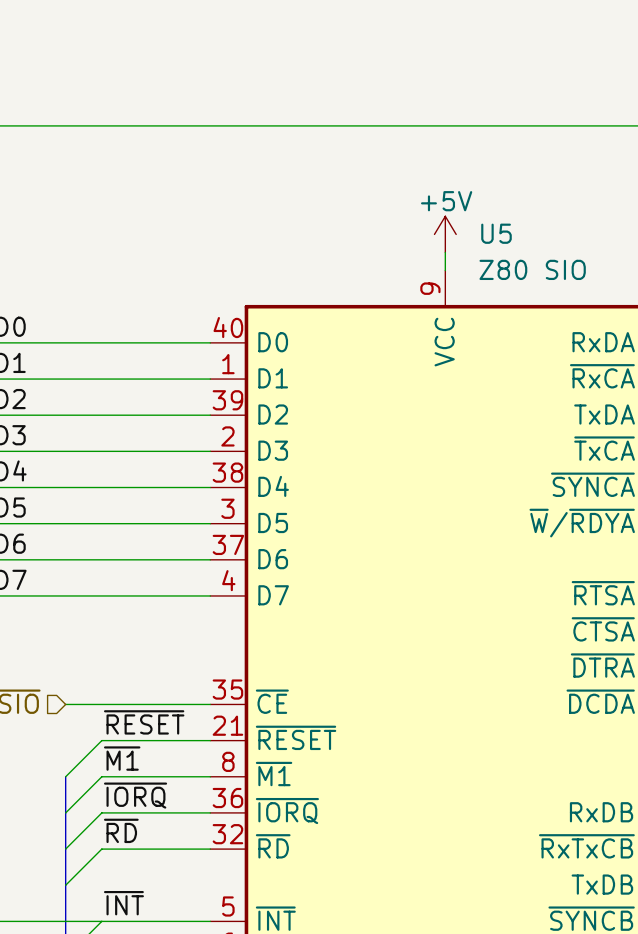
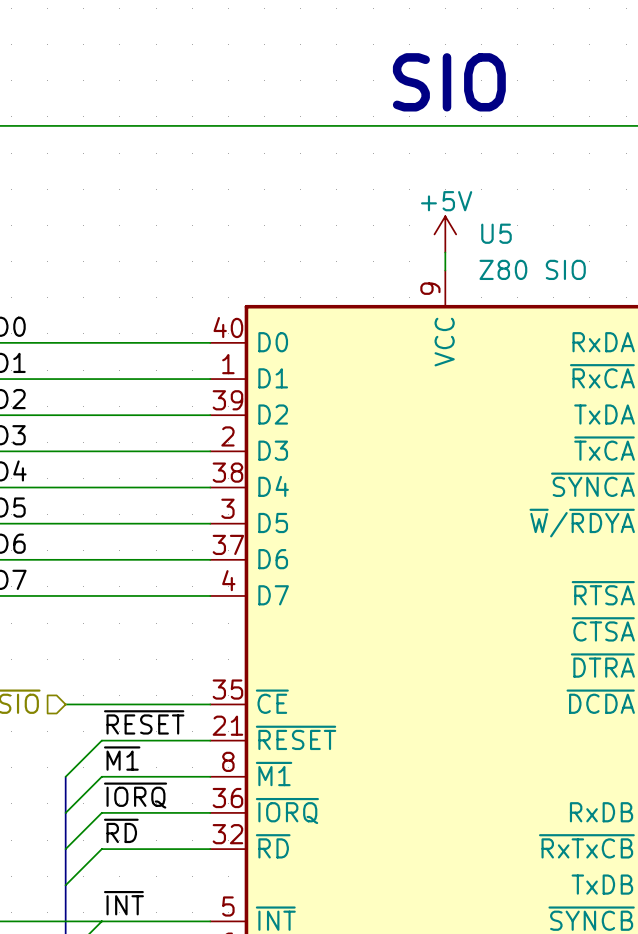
text: none -> SIO (449, 82)

